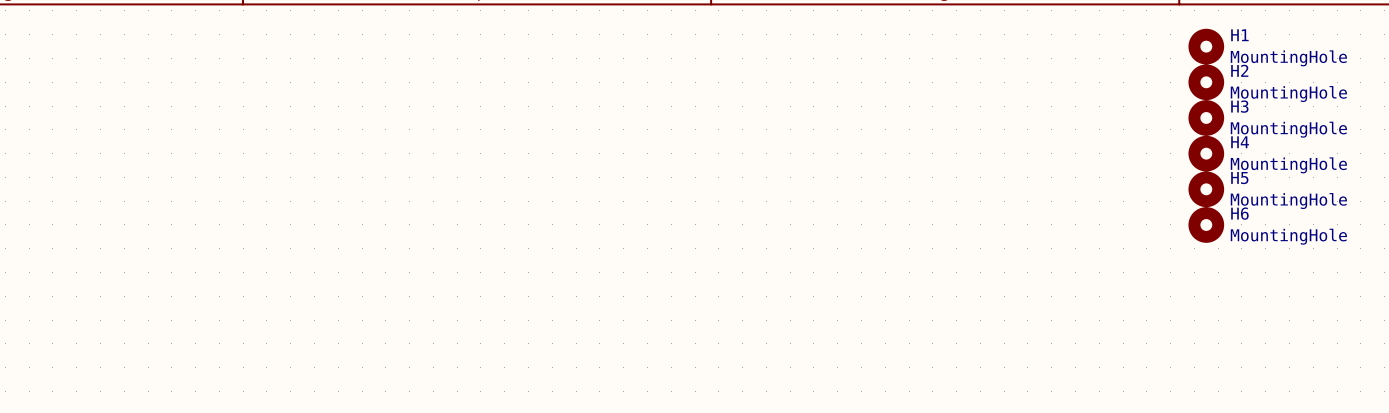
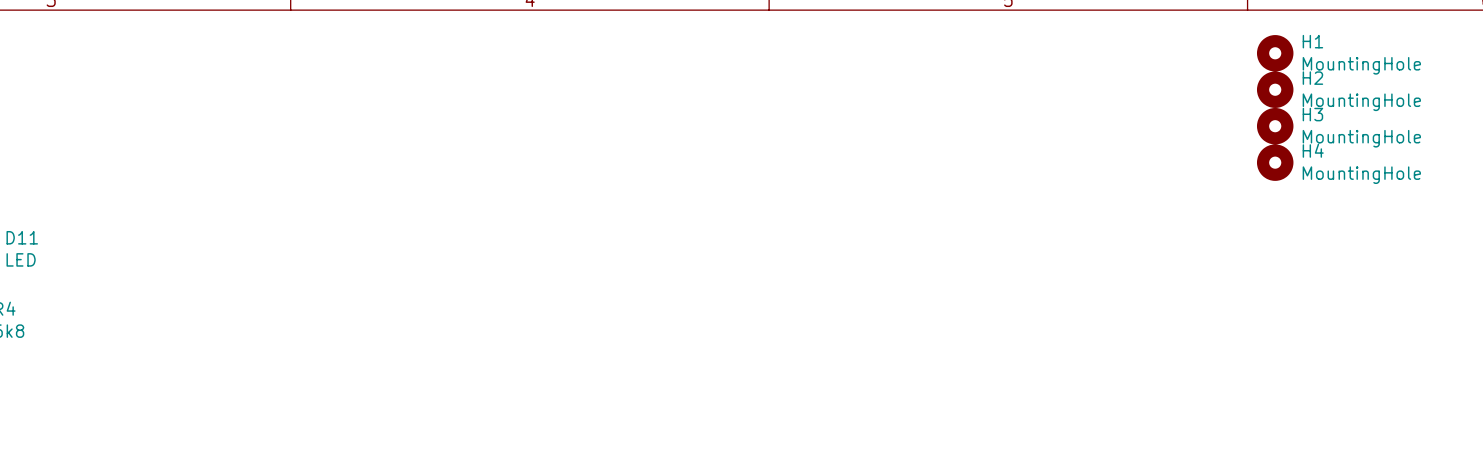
H5: MountingHole (1206, 189) -> none
H6: MountingHole (1206, 224) -> none

